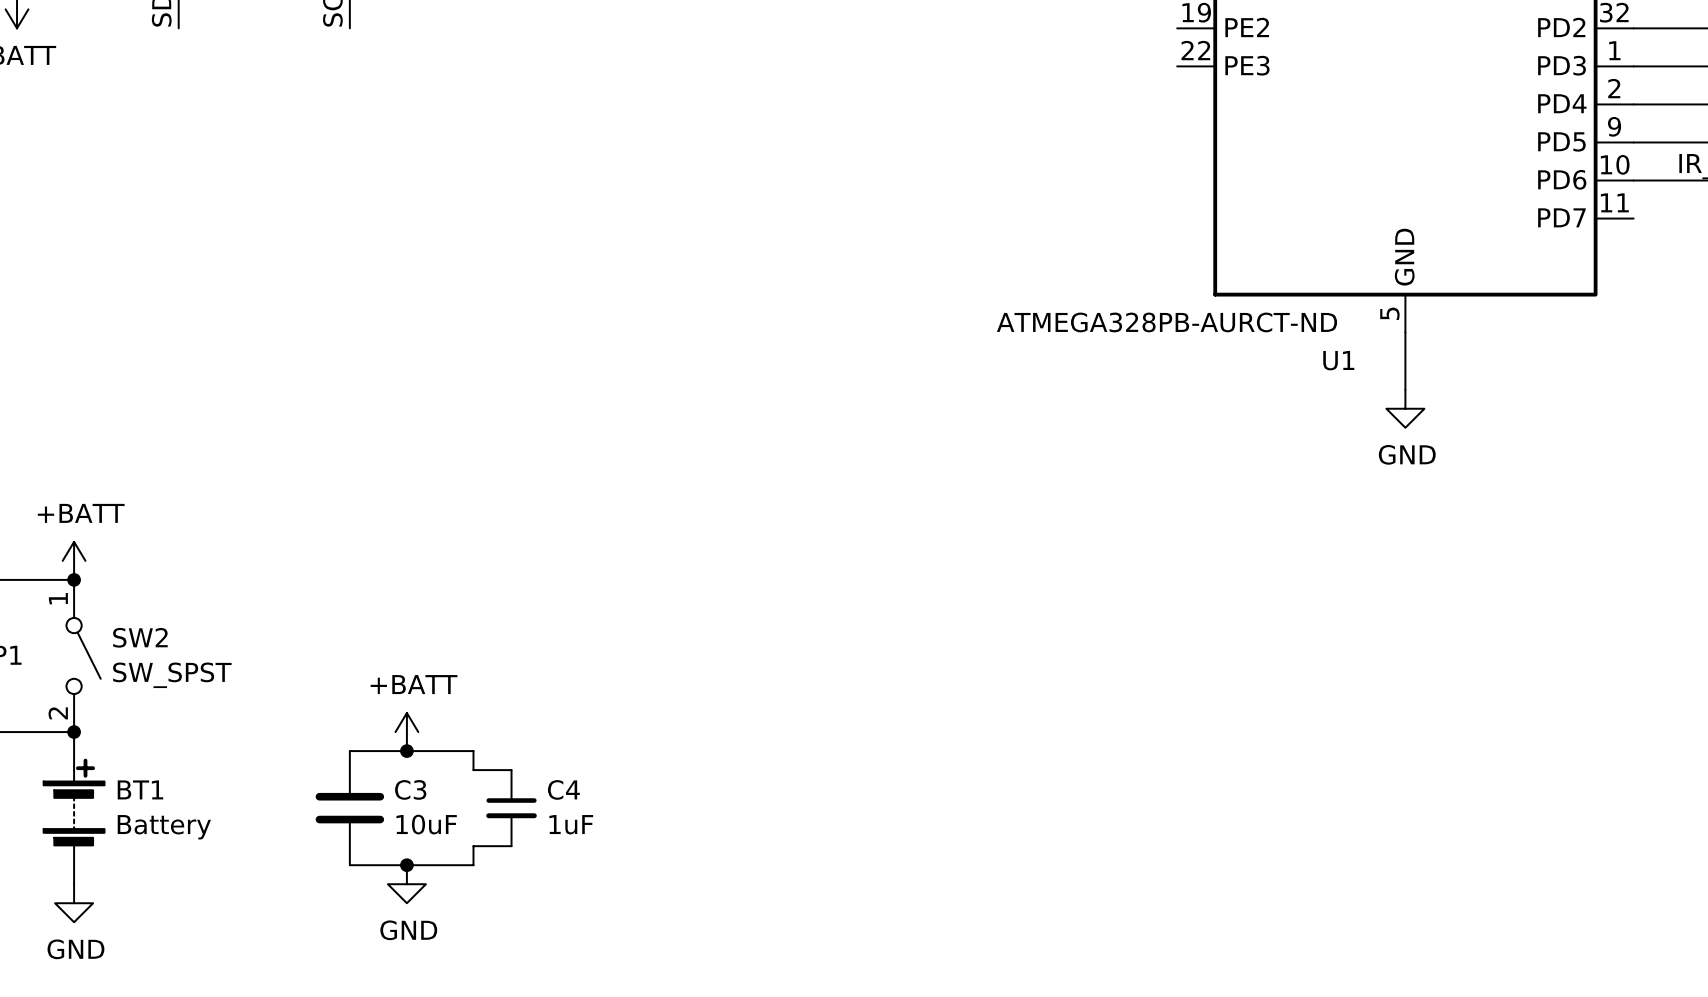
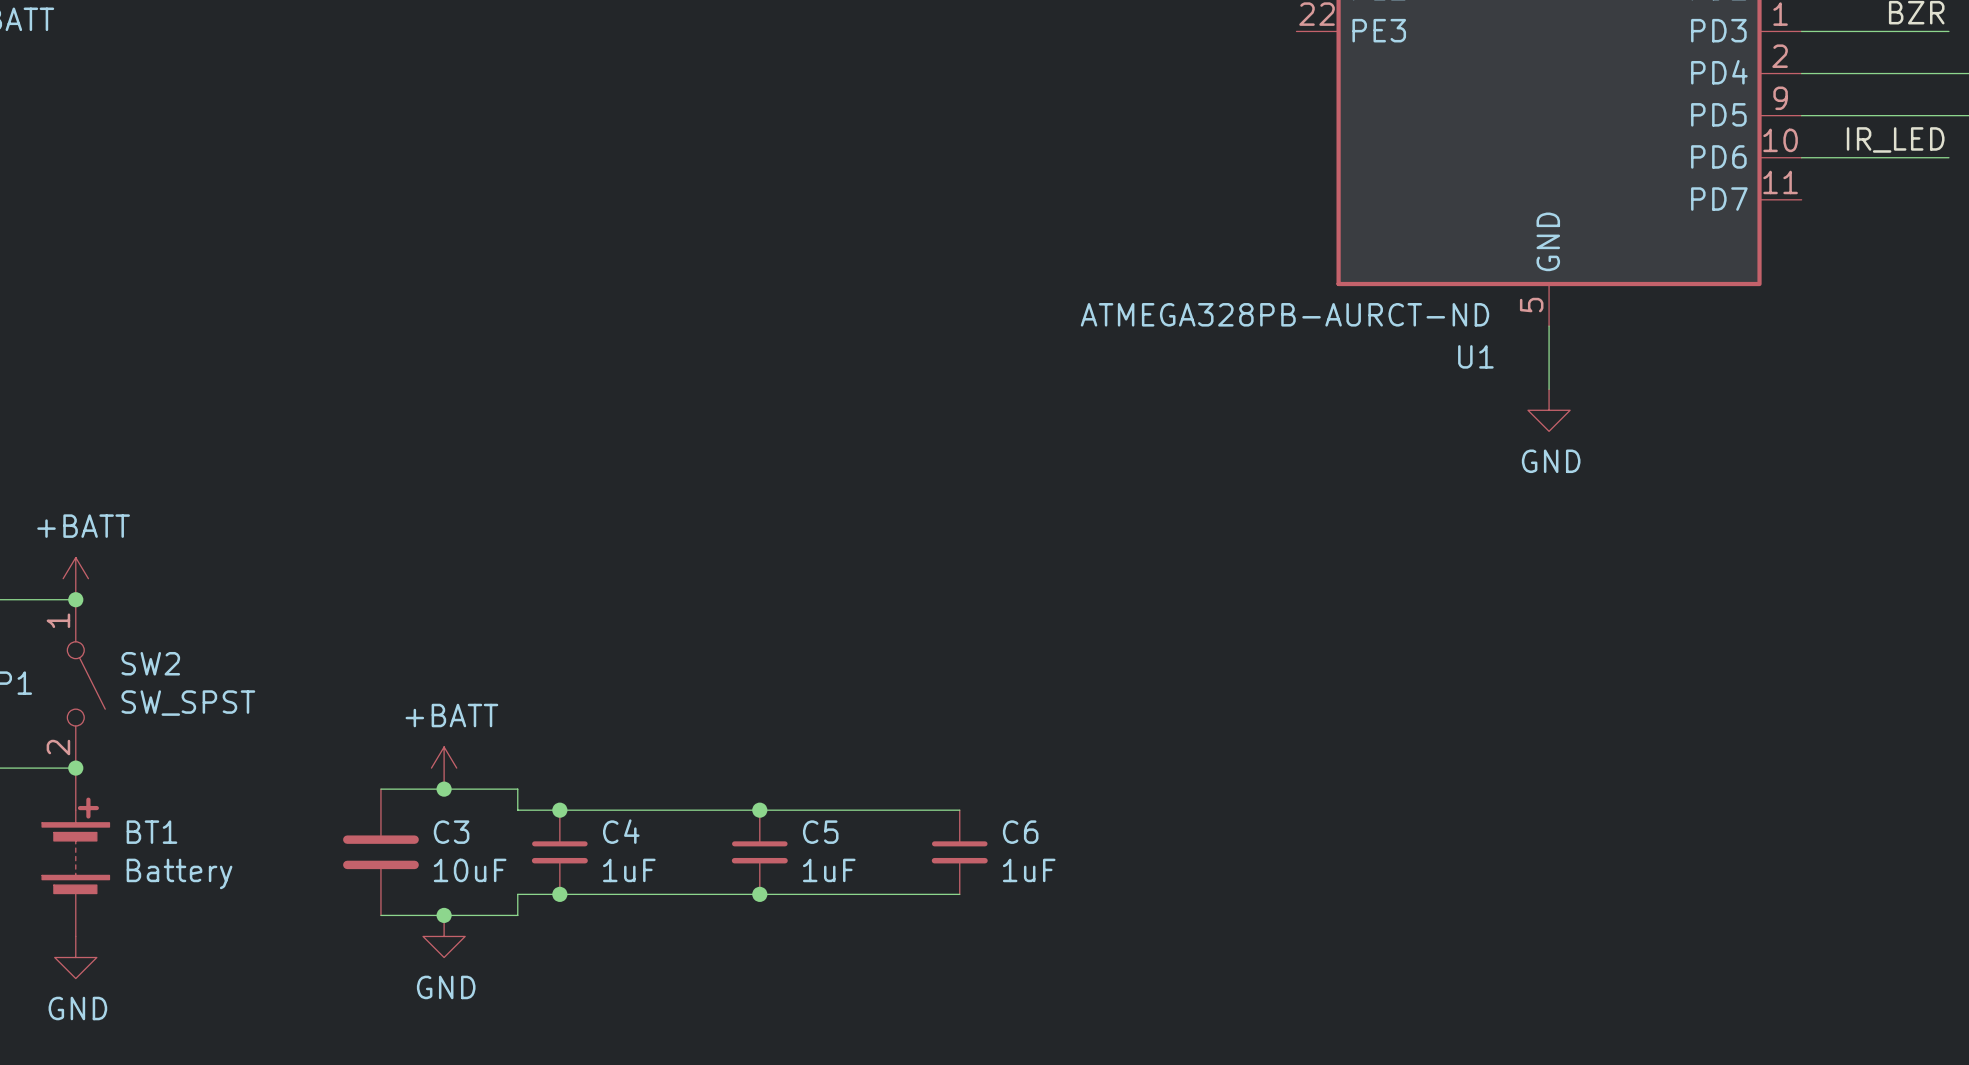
wire: none -> (559, 810) (959, 810)
junction: none -> (559, 810)
junction: none -> (759, 810)
C5: none -> 1uF (759, 852)
C6: none -> 1uF (959, 852)
wire: none -> (559, 894) (959, 894)
junction: none -> (559, 894)
junction: none -> (759, 894)

